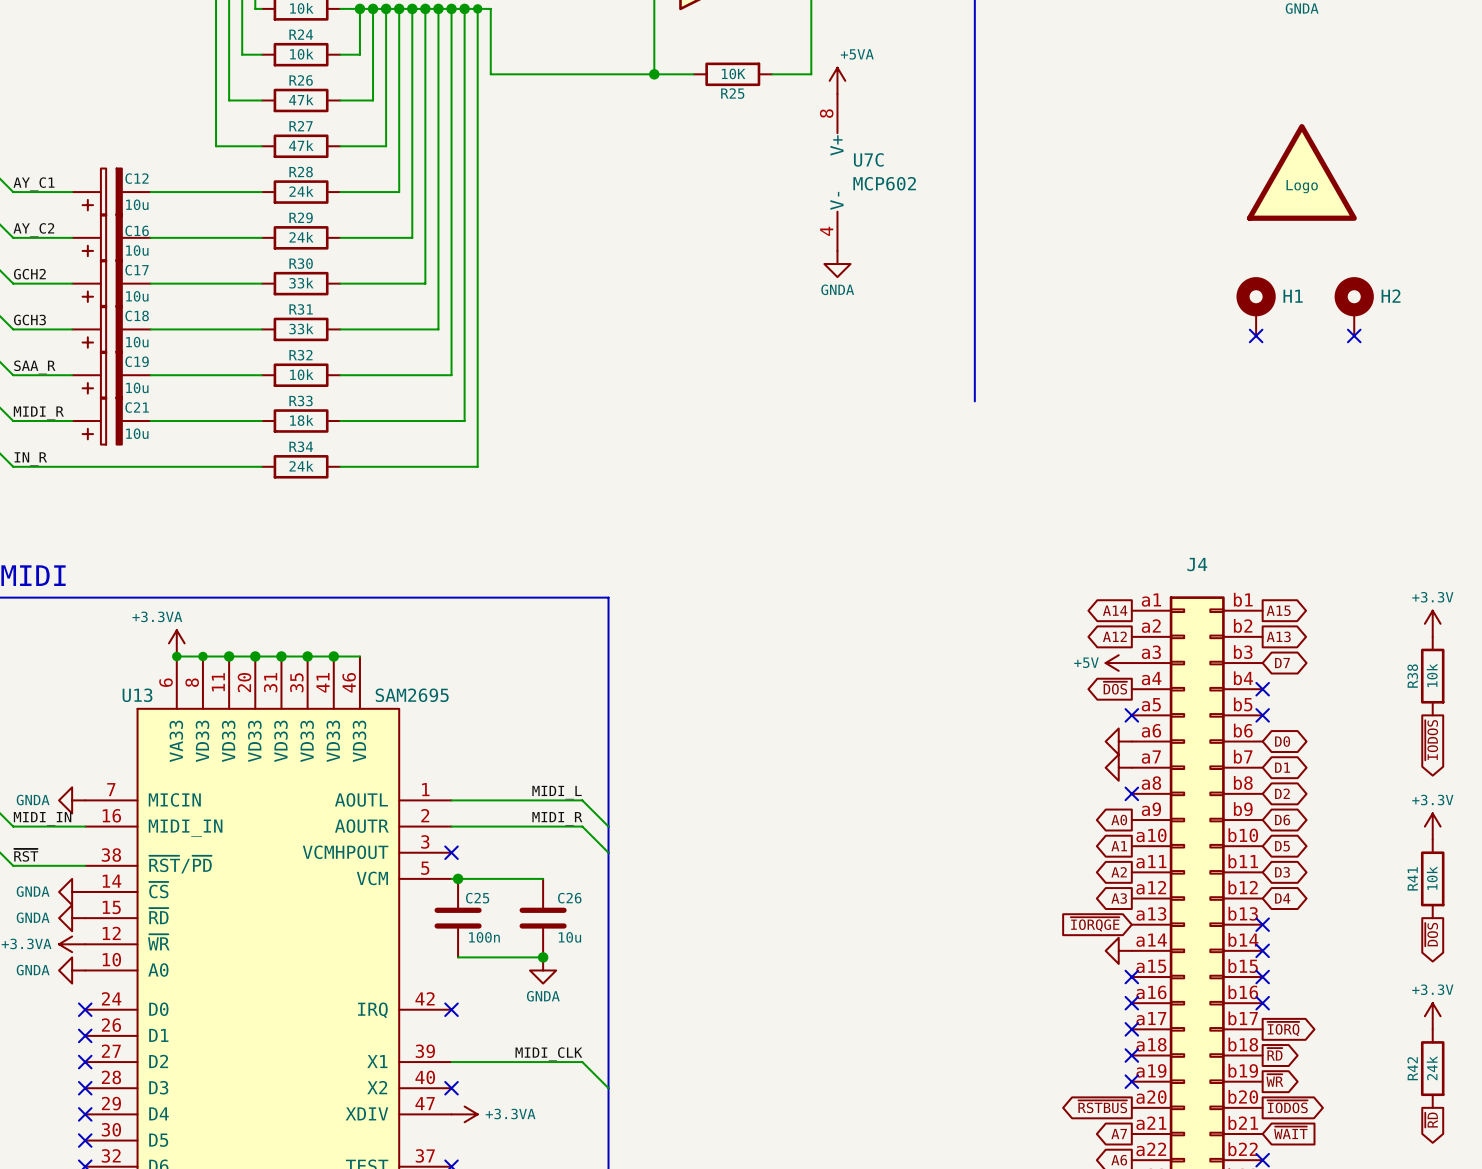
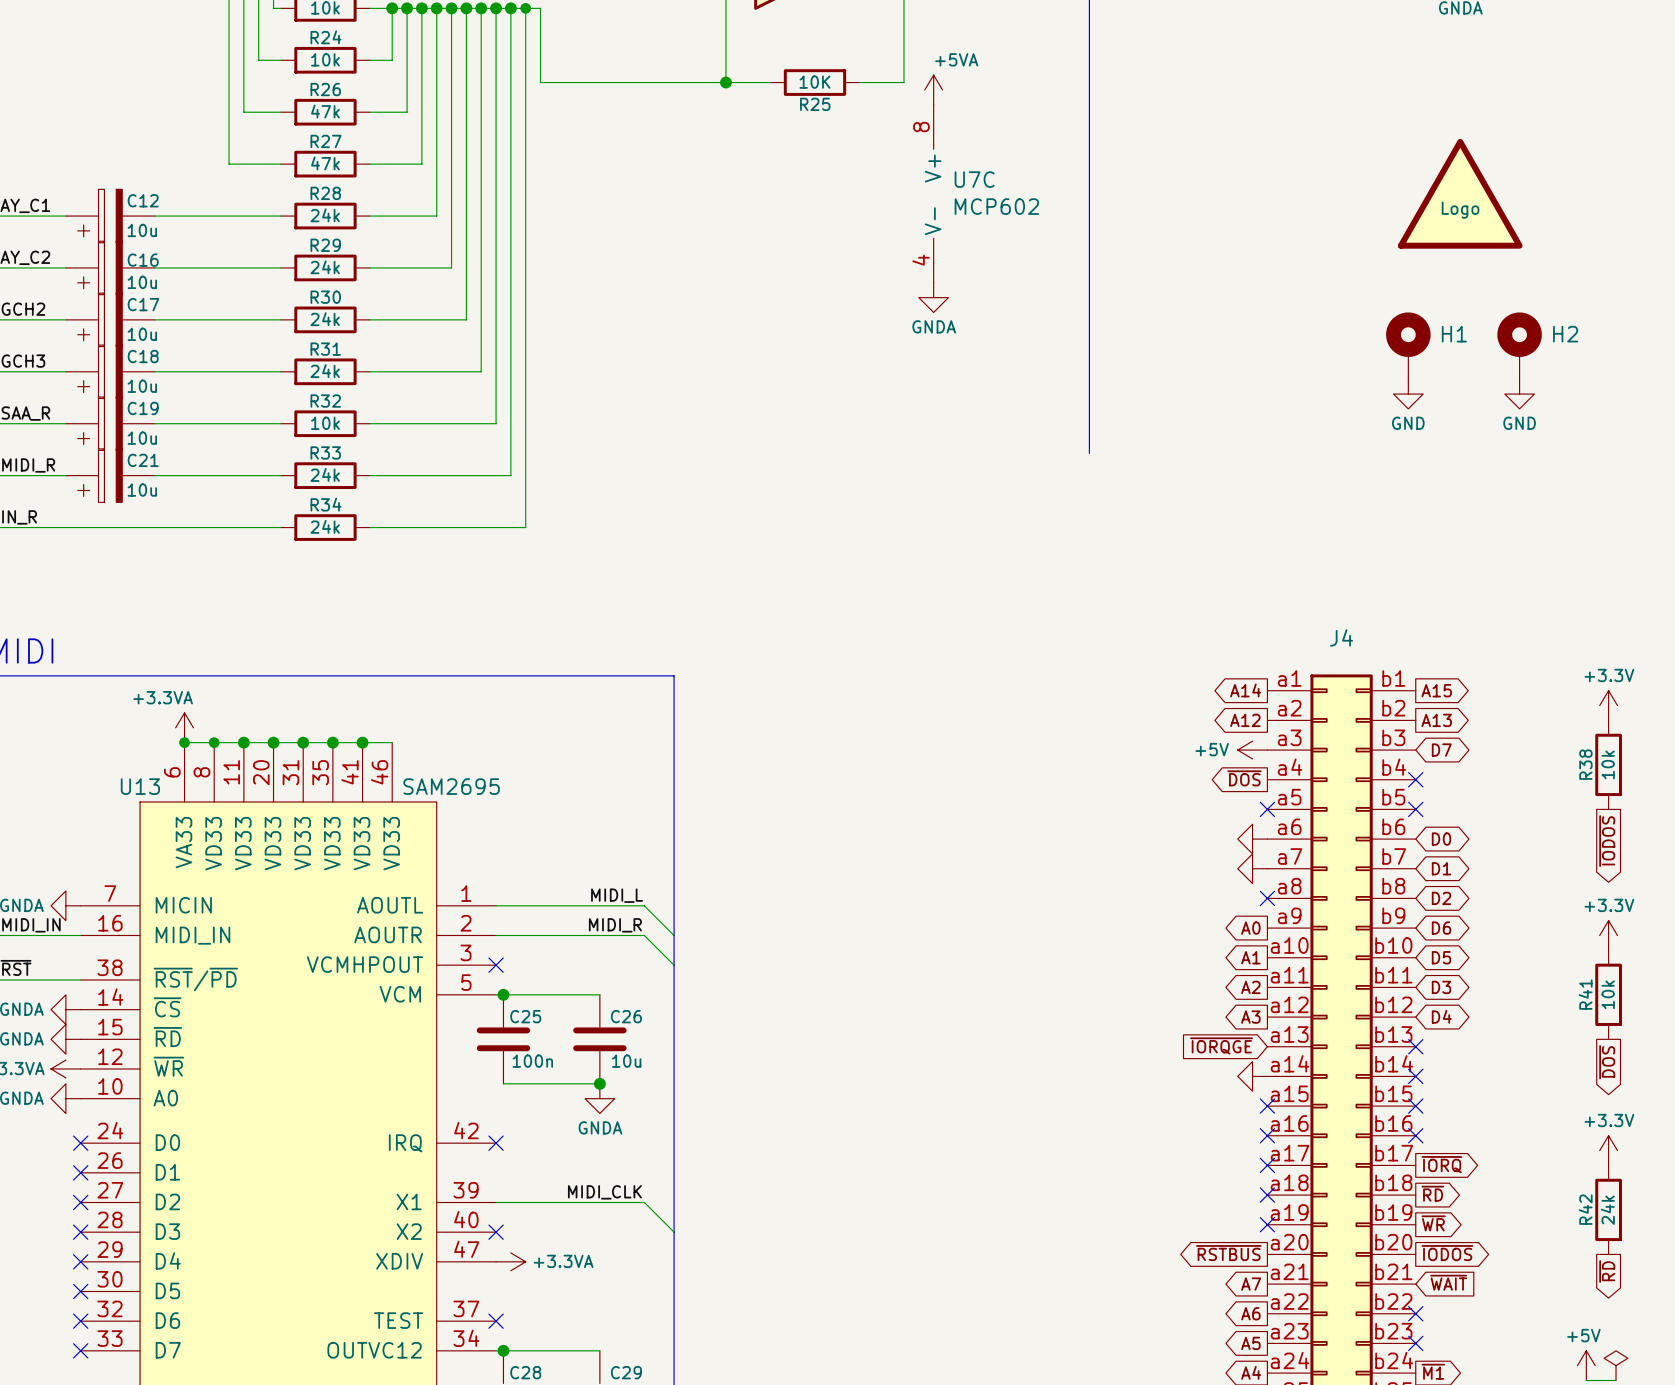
R30 value: 33k (301, 283) -> 24k (325, 319)
R31 value: 33k (301, 328) -> 24k (325, 371)
no-connect mark: (1256, 335) -> none
no-connect mark: (1354, 335) -> none
power symbol: none -> GND (1408, 394)
power symbol: none -> GND (1519, 394)
R33 value: 18k (301, 420) -> 24k (325, 474)

